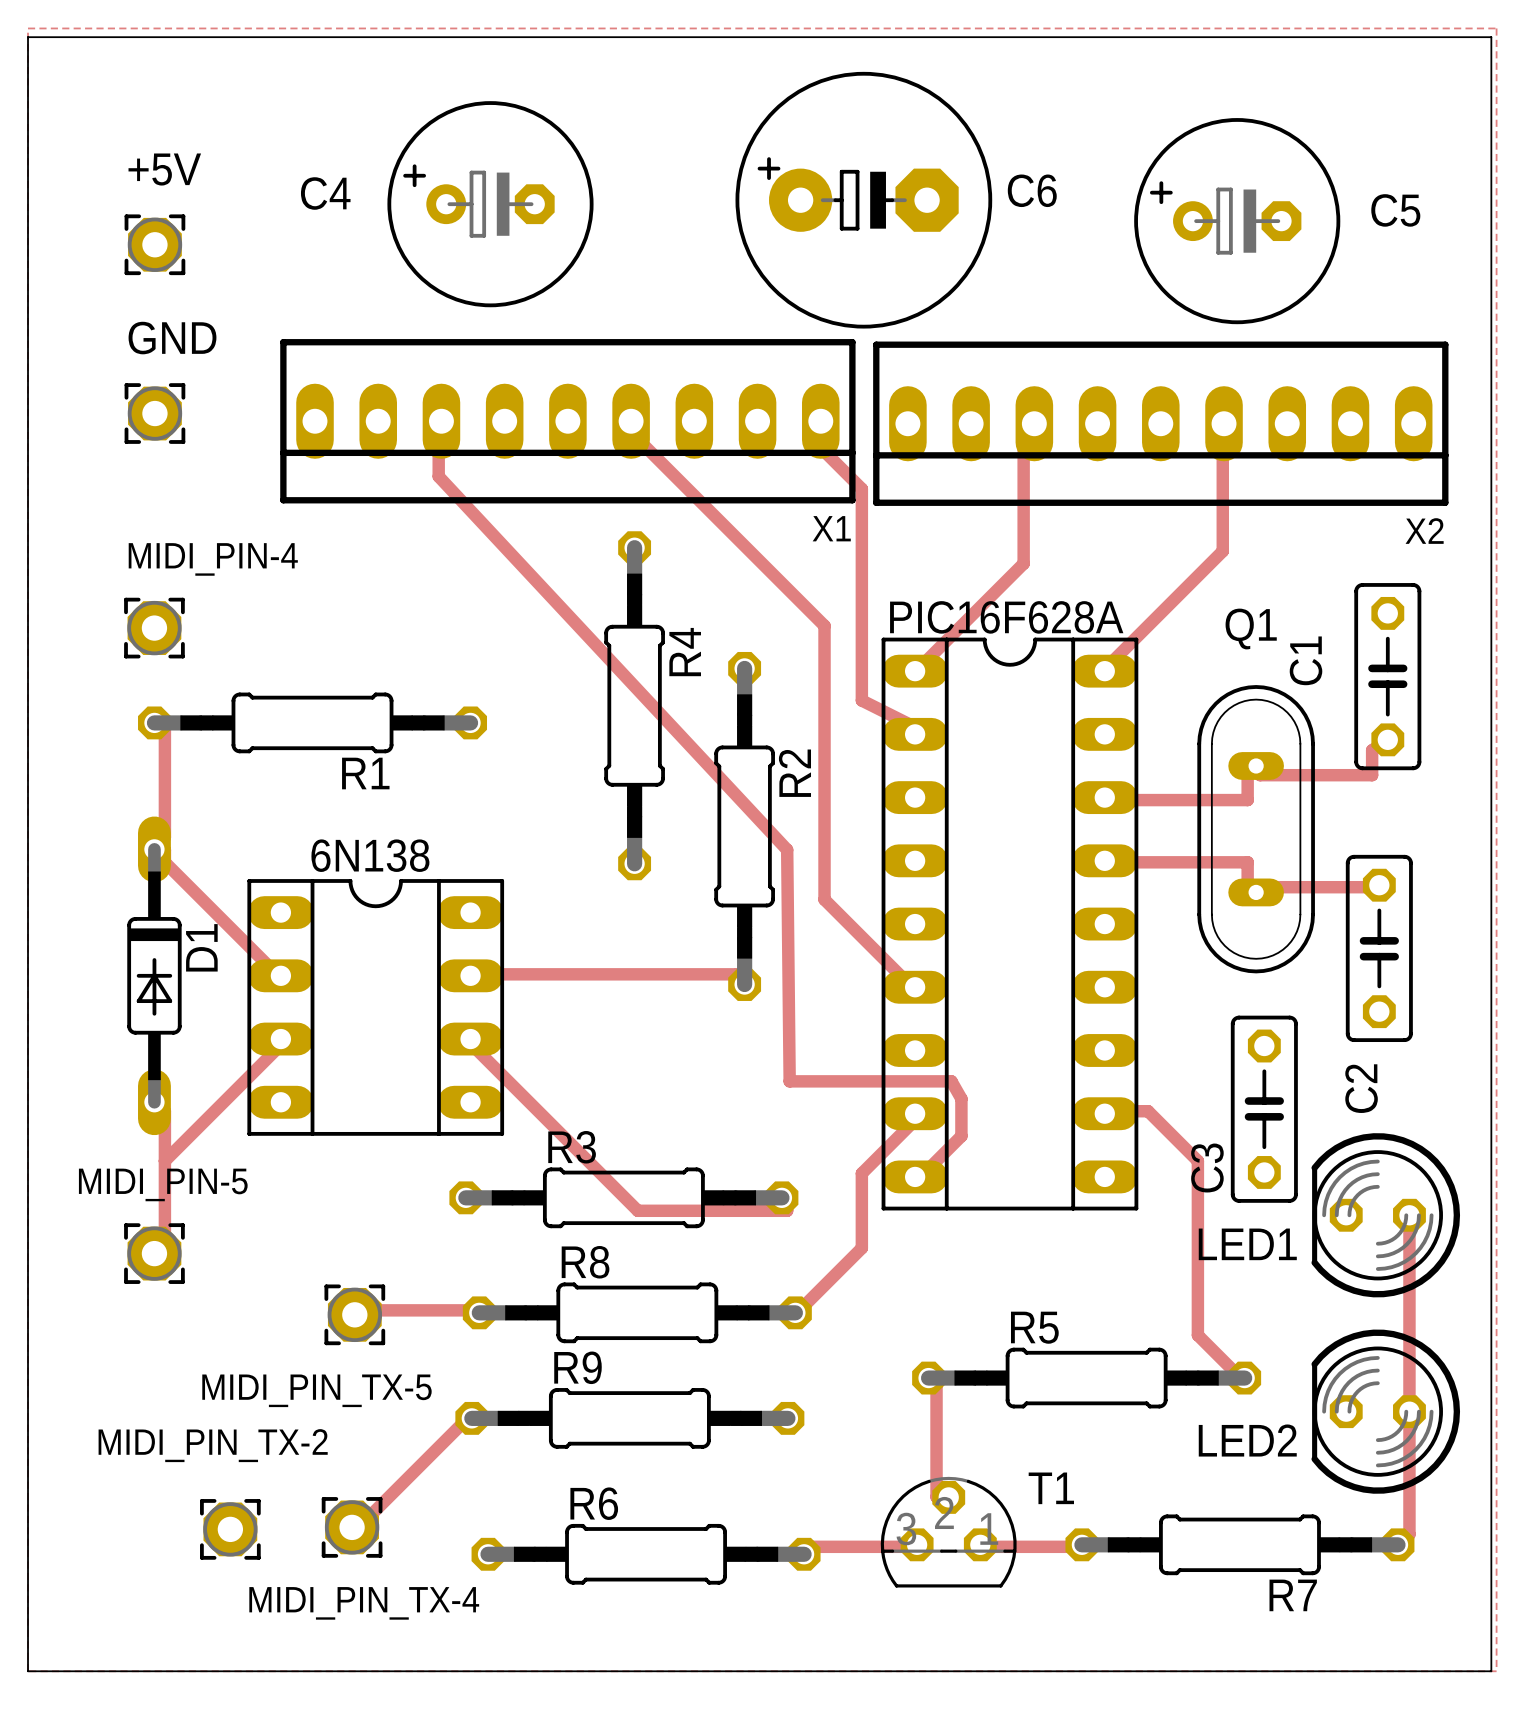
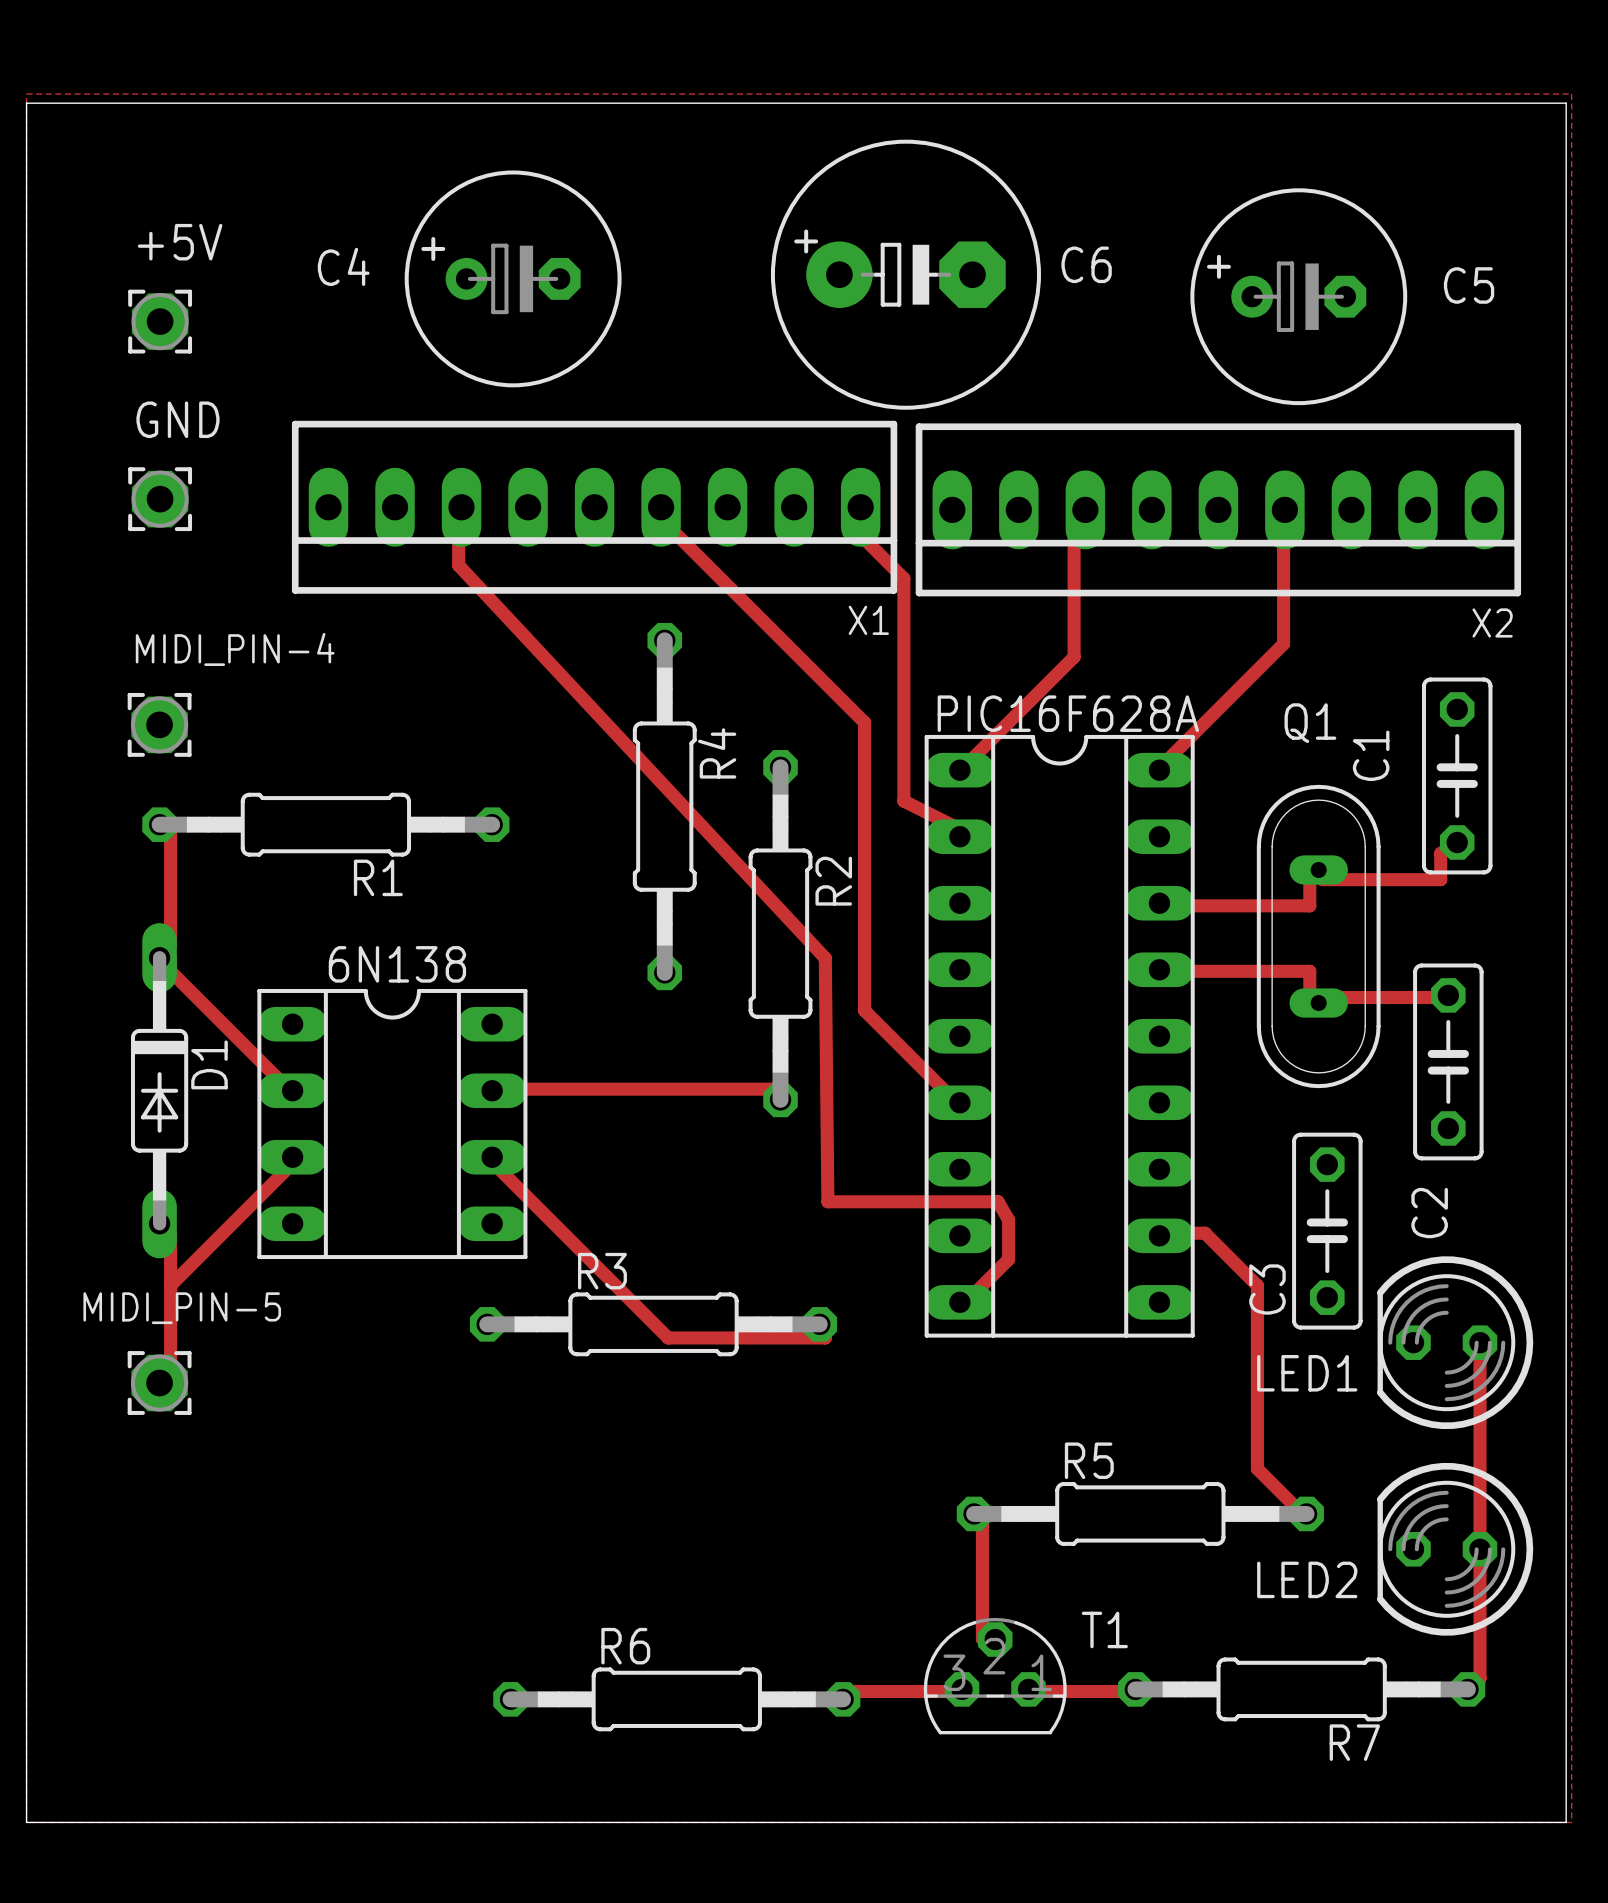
track: (915, 1113) (911, 1123) (861, 1173) (861, 1248) (795, 1312) -> none
track: (479, 1312) (476, 1310) (364, 1310) (354, 1314) -> none
R8: (637, 1312) -> none
MIDI_PIN_TX-5: (354, 1314) -> none
track: (471, 1418) (463, 1422) (364, 1521) (352, 1527) -> none
R9: (629, 1418) -> none
MIDI_PIN_TX-4: (352, 1527) -> none
MIDI_PIN_TX-2: (230, 1529) -> none

